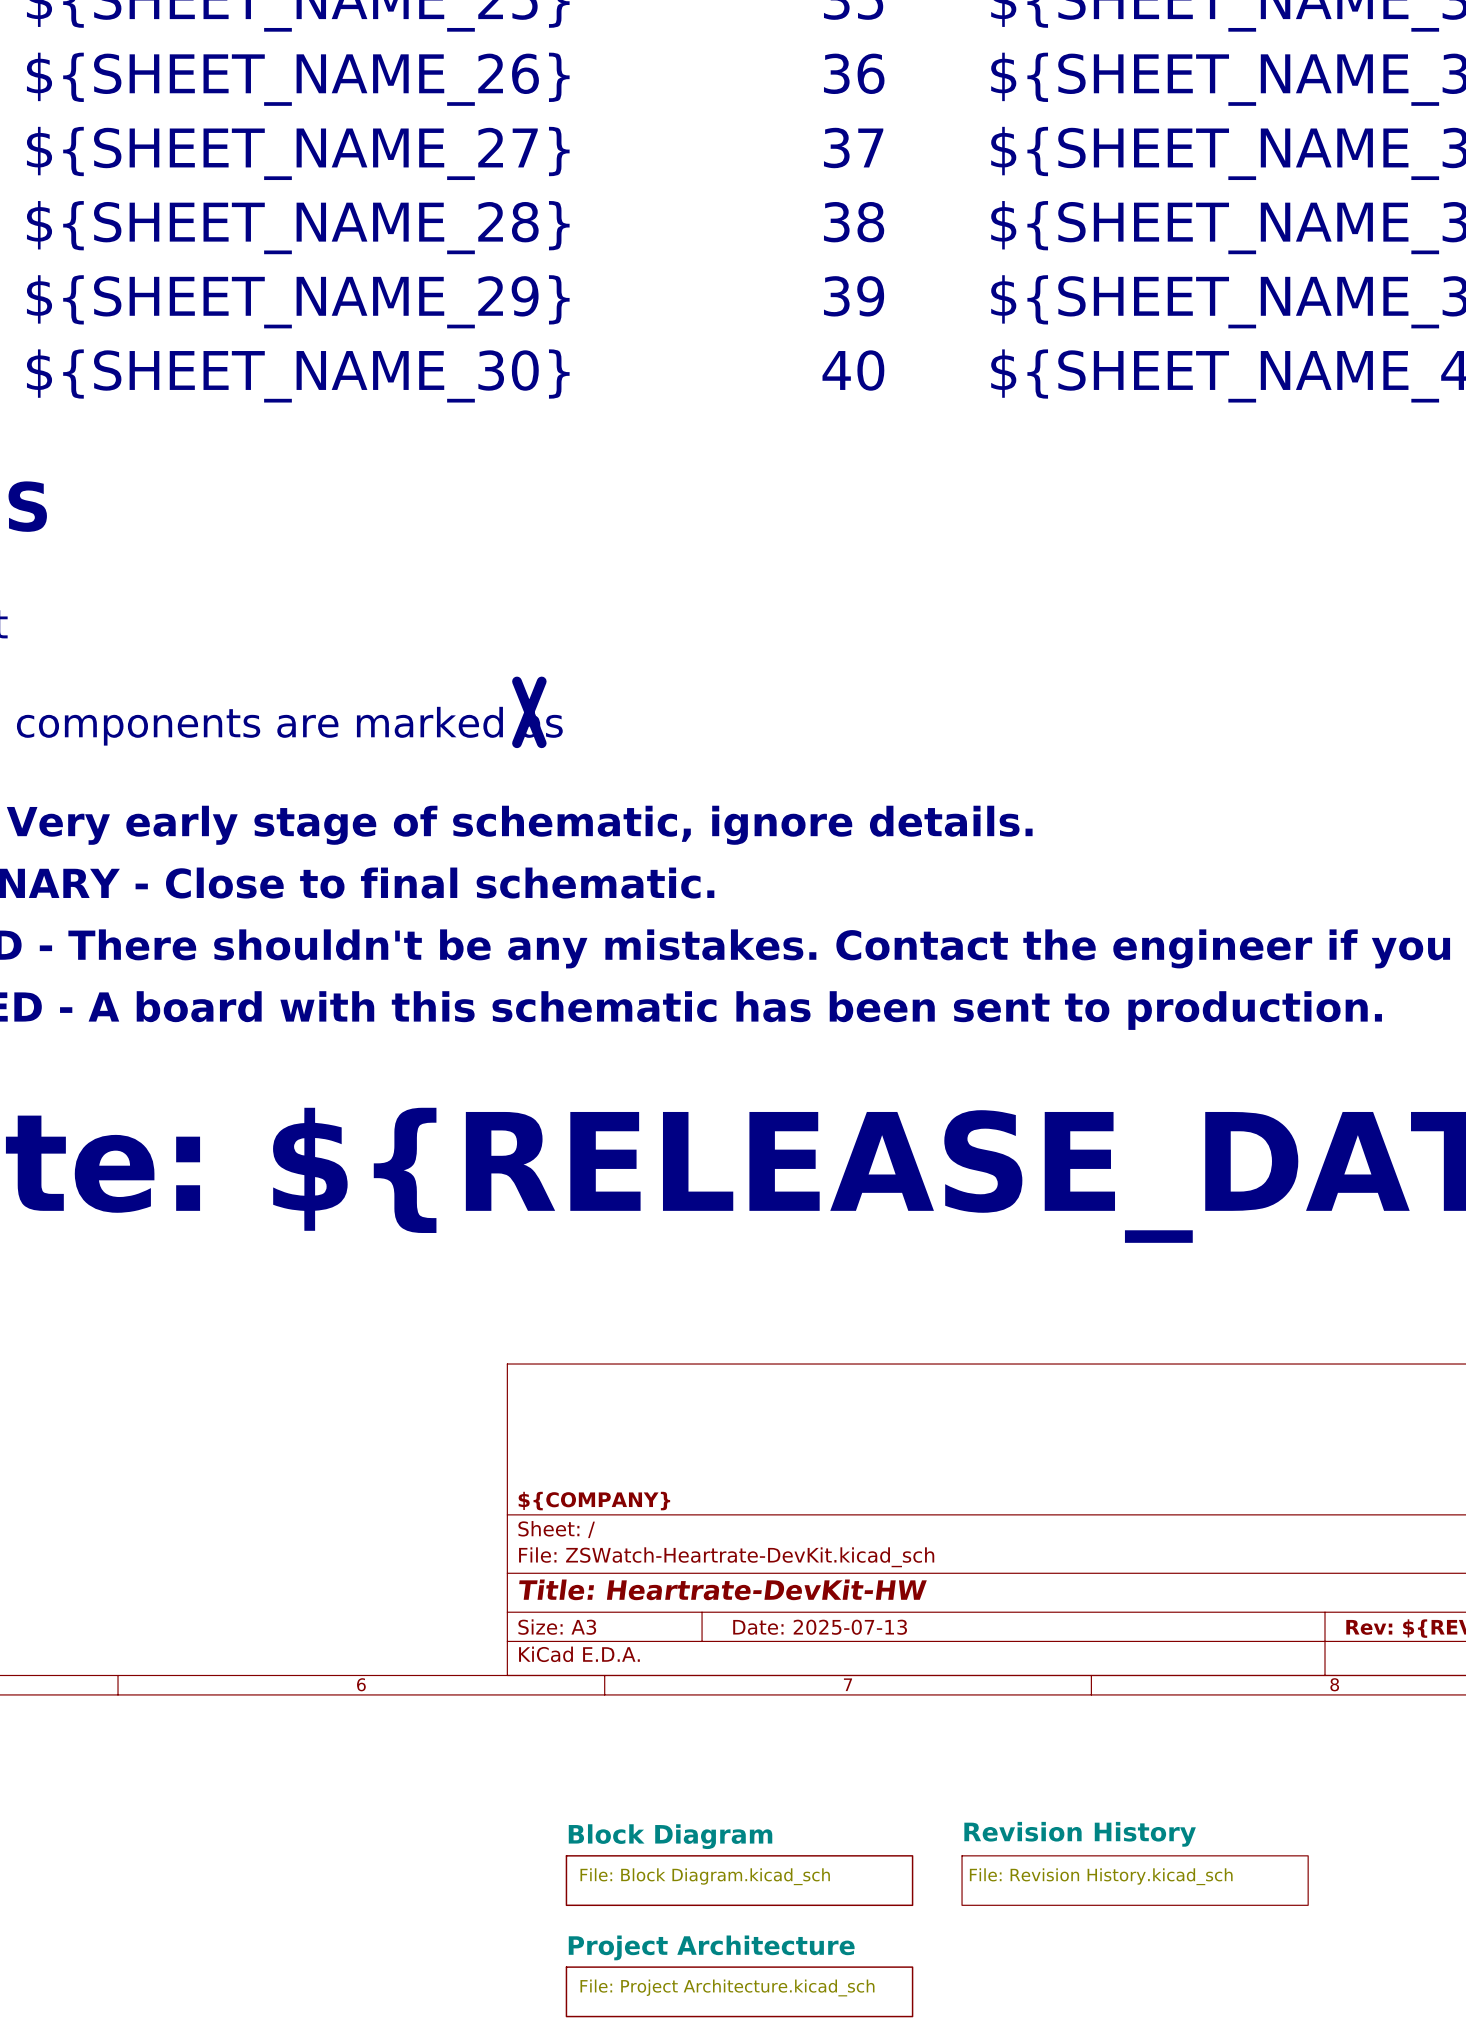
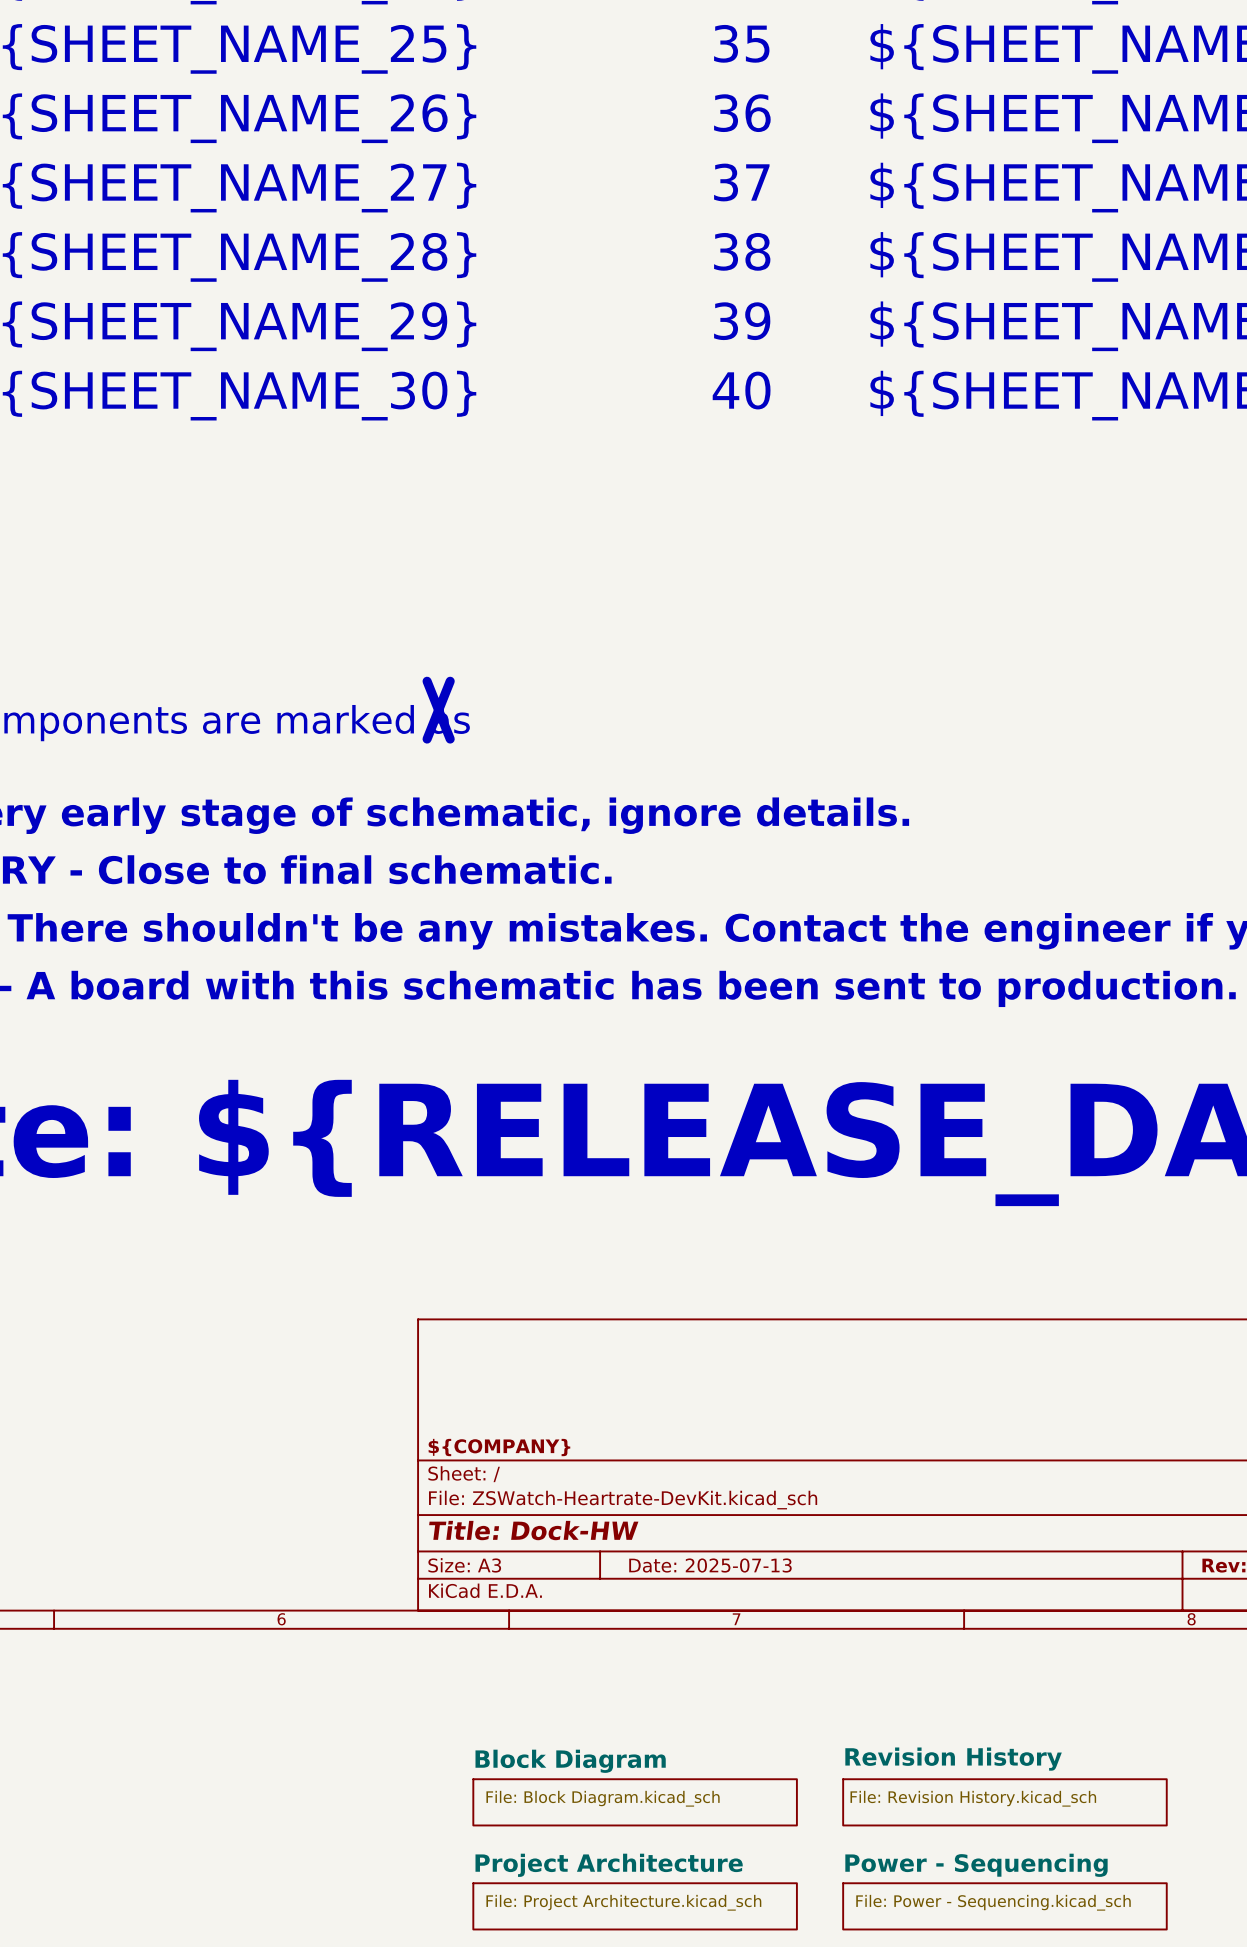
title block: Title: Heartrate-DevKit-HW (722, 1589) -> Title: Dock-HW (533, 1530)
sheet Power - Sequencing: none -> File: Power - Sequencing.kicad_sch (1004, 1906)

